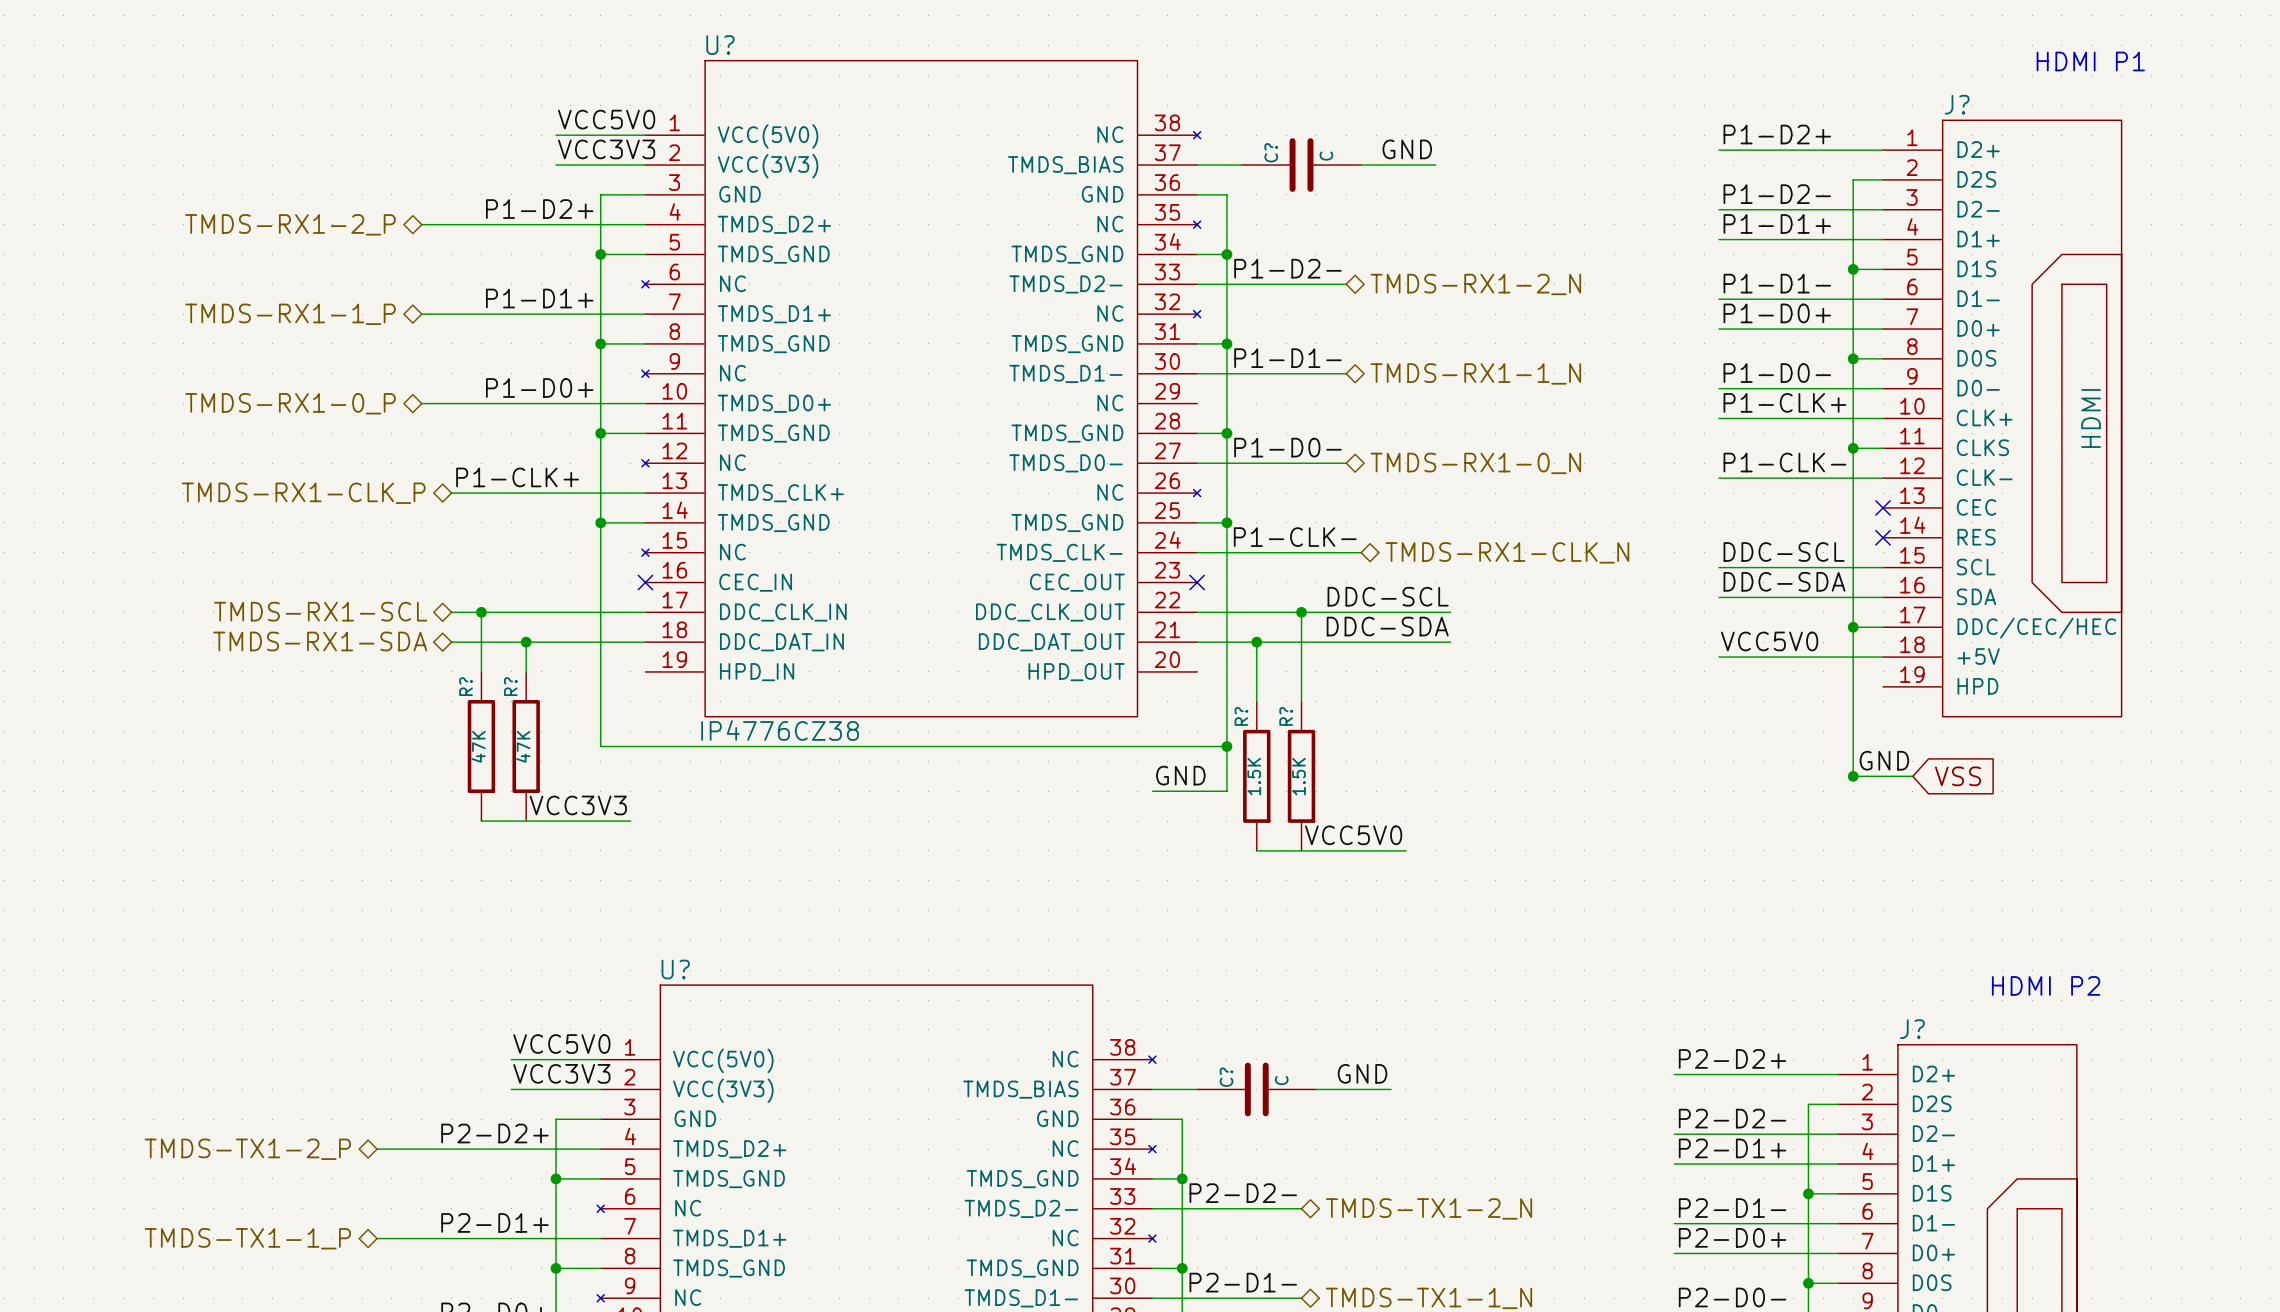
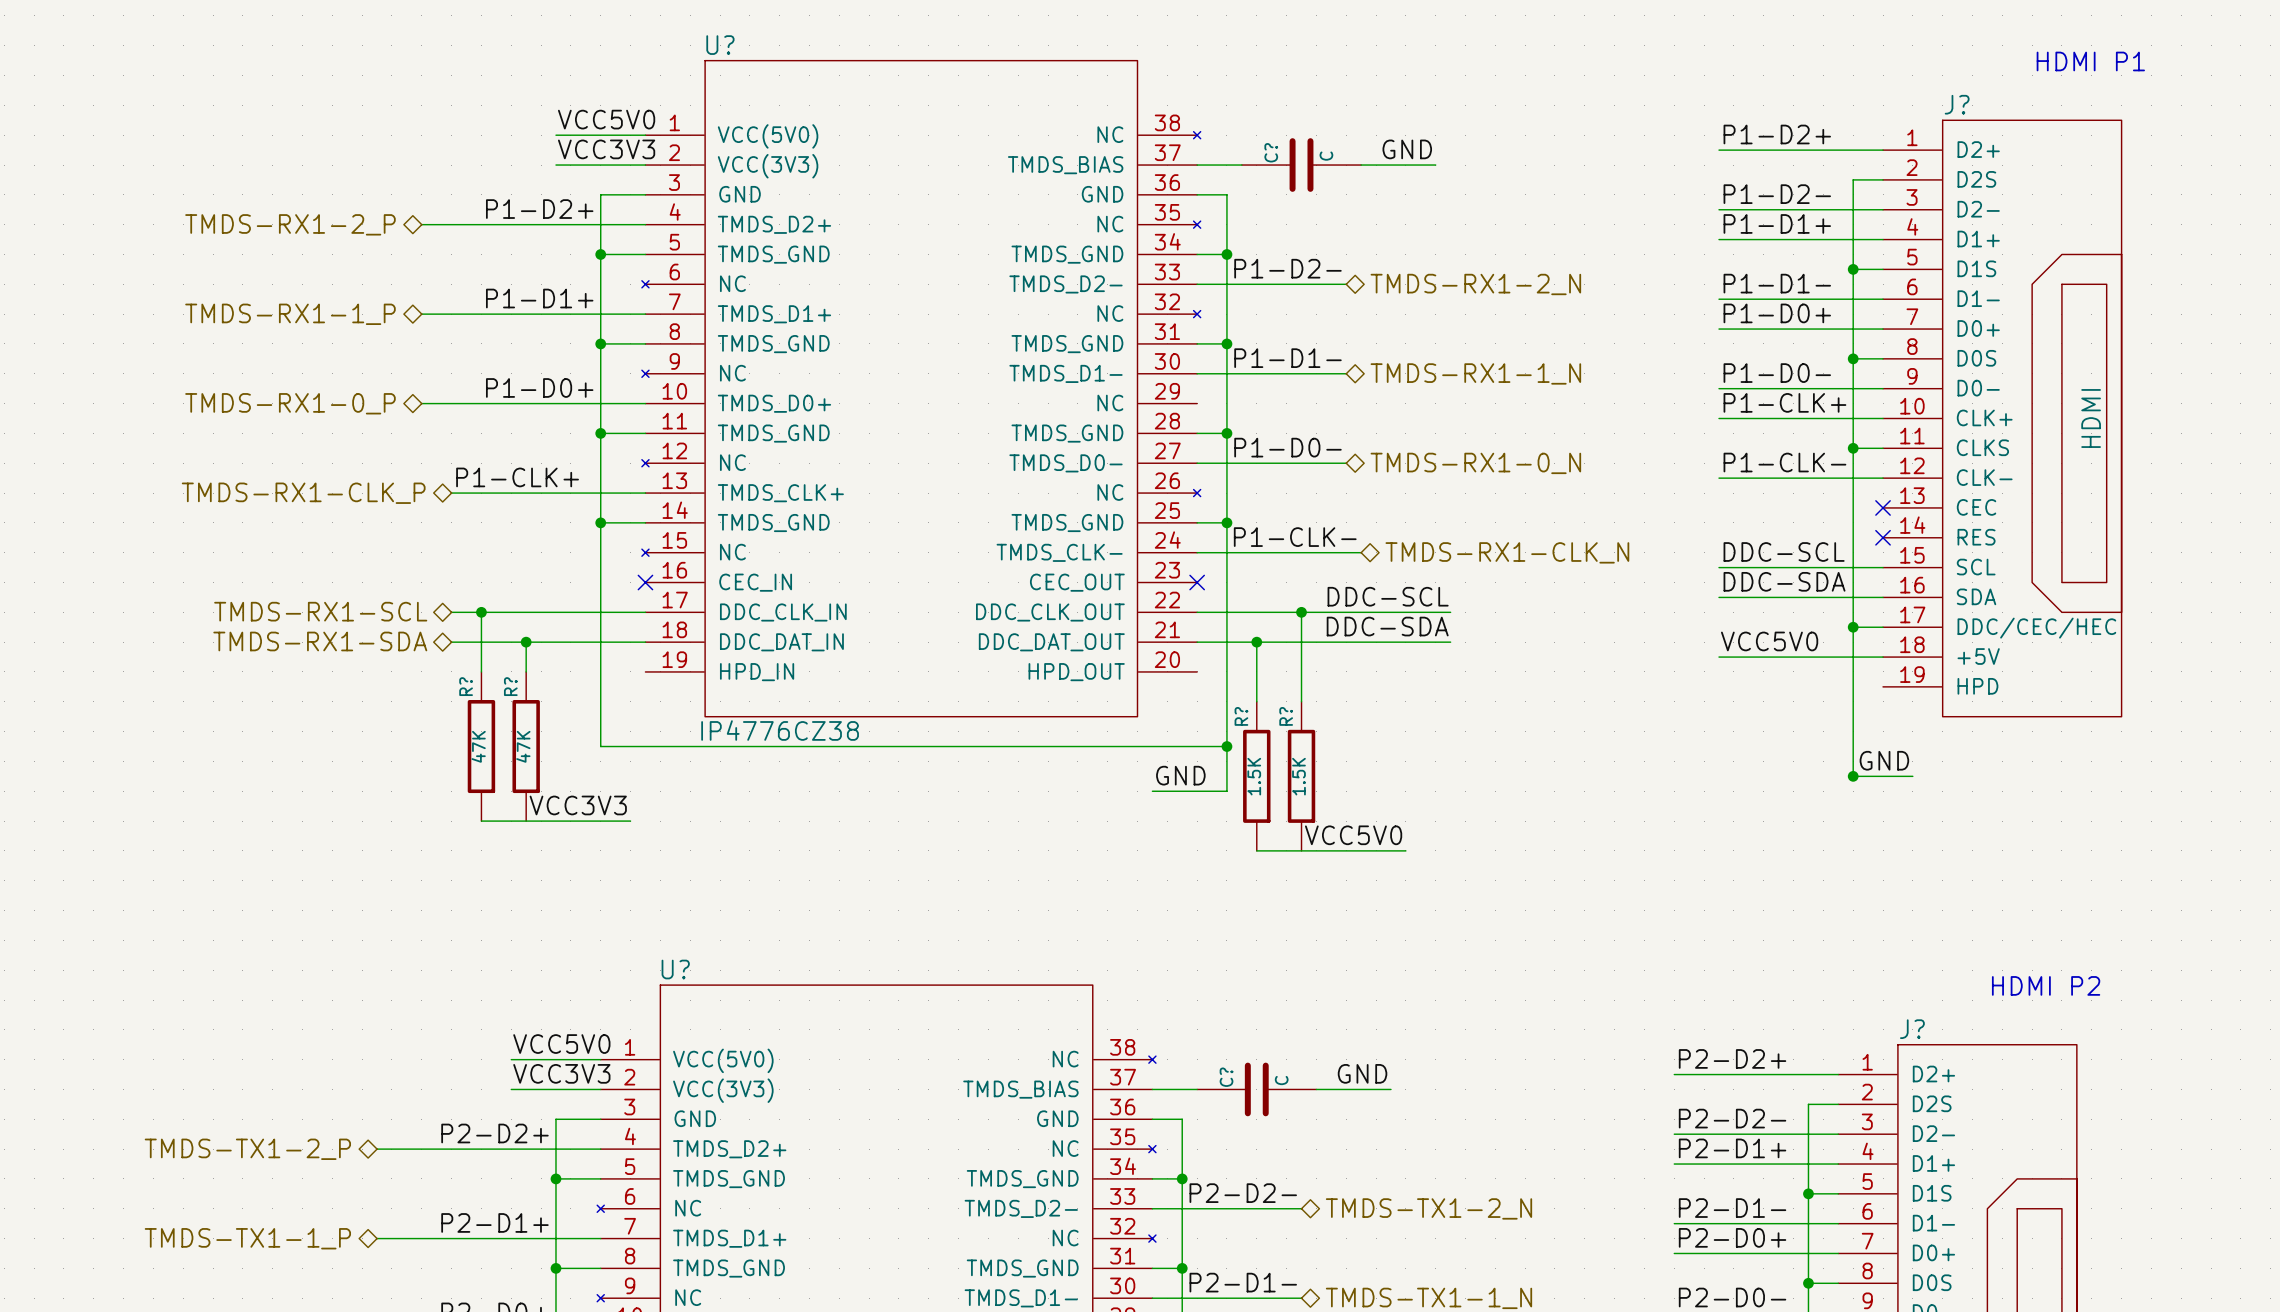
global label: VSS (1958, 776) -> none

